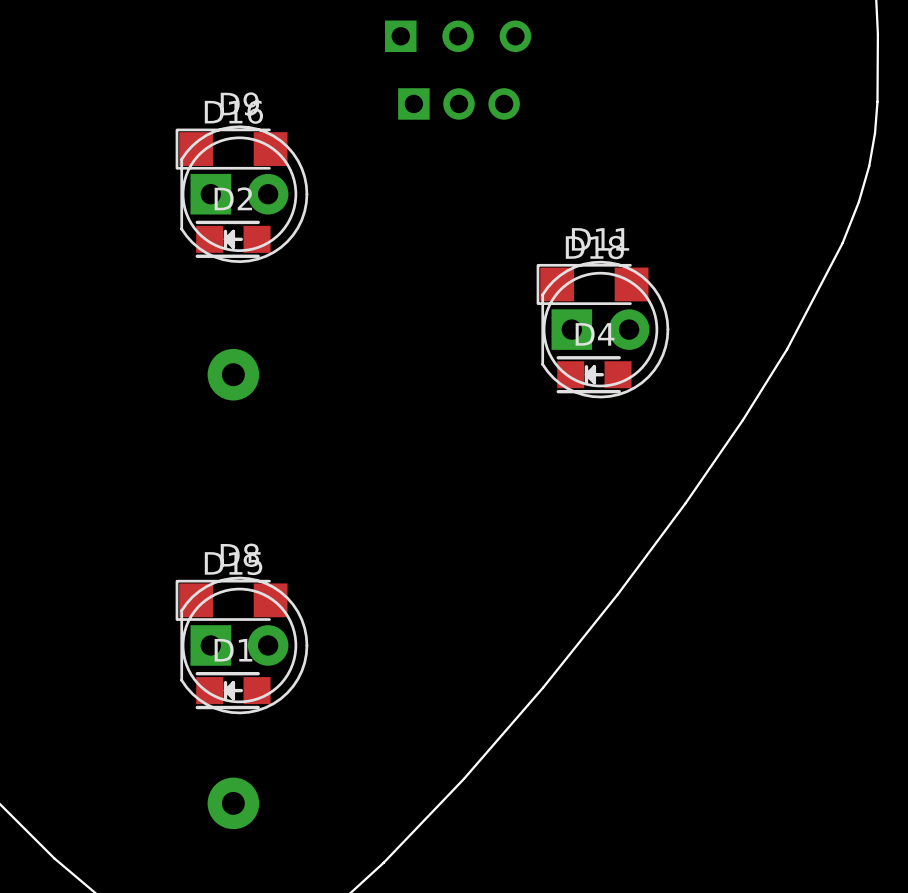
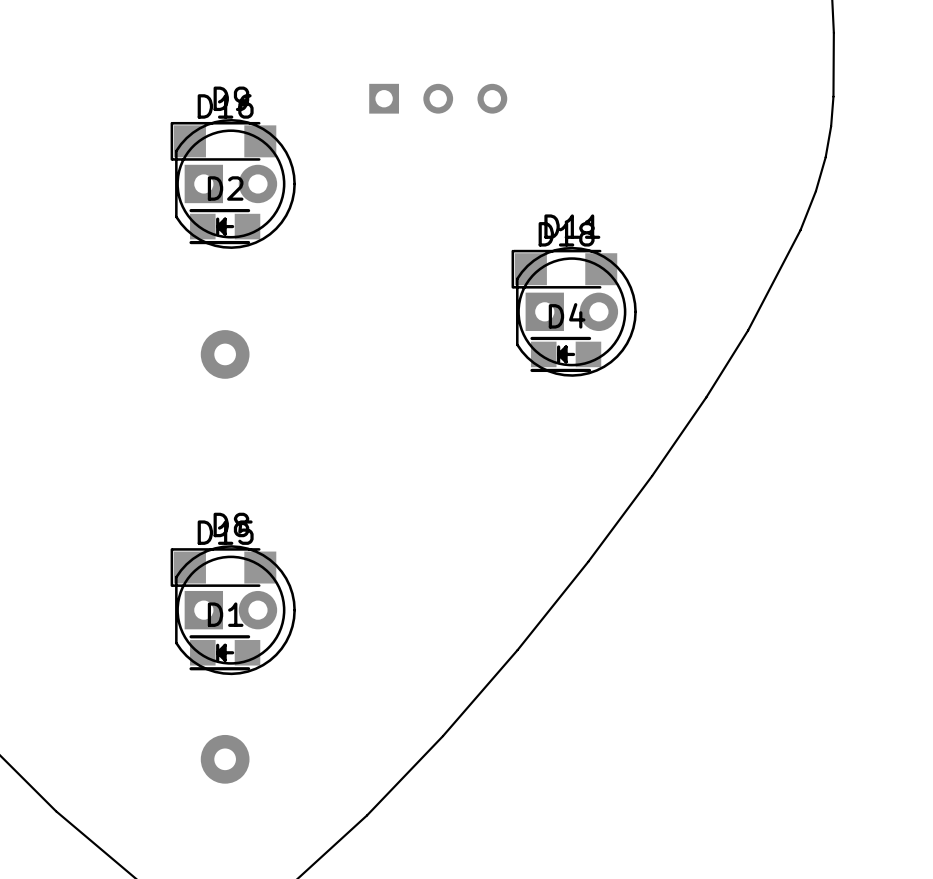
part: (458, 36) -> none
part footprint: [398, 88, 520, 120] -> [369, 83, 508, 114]

